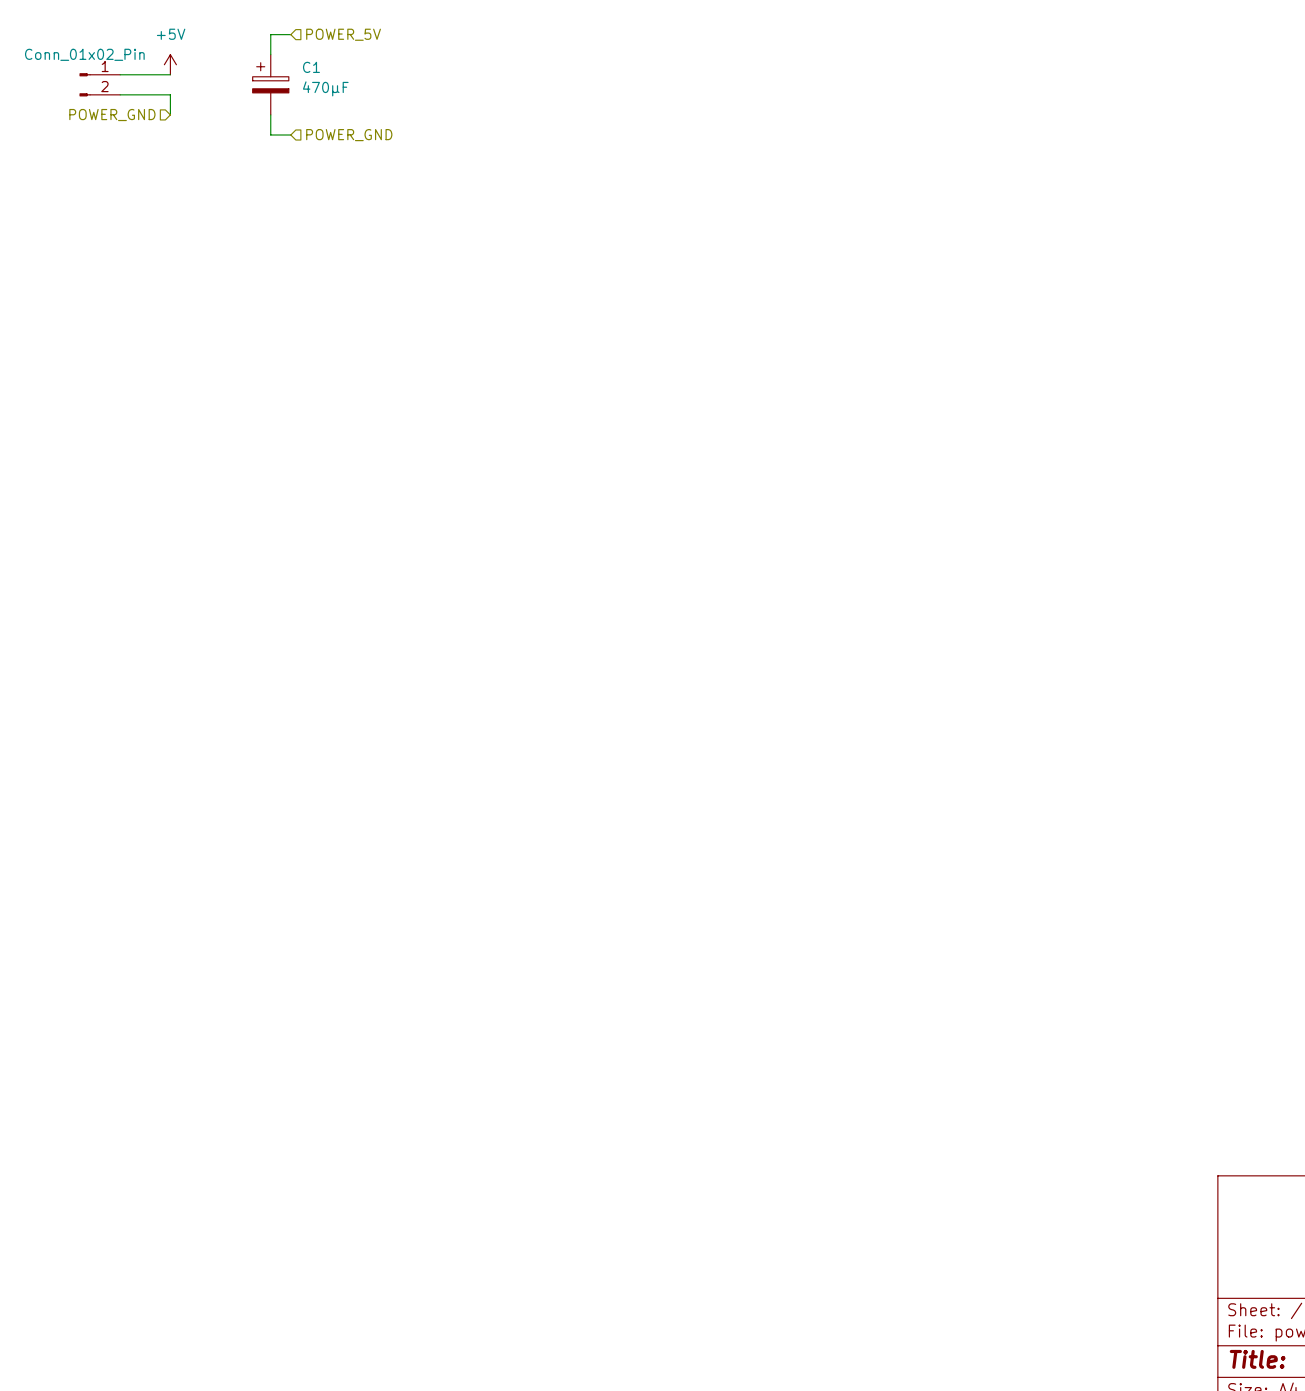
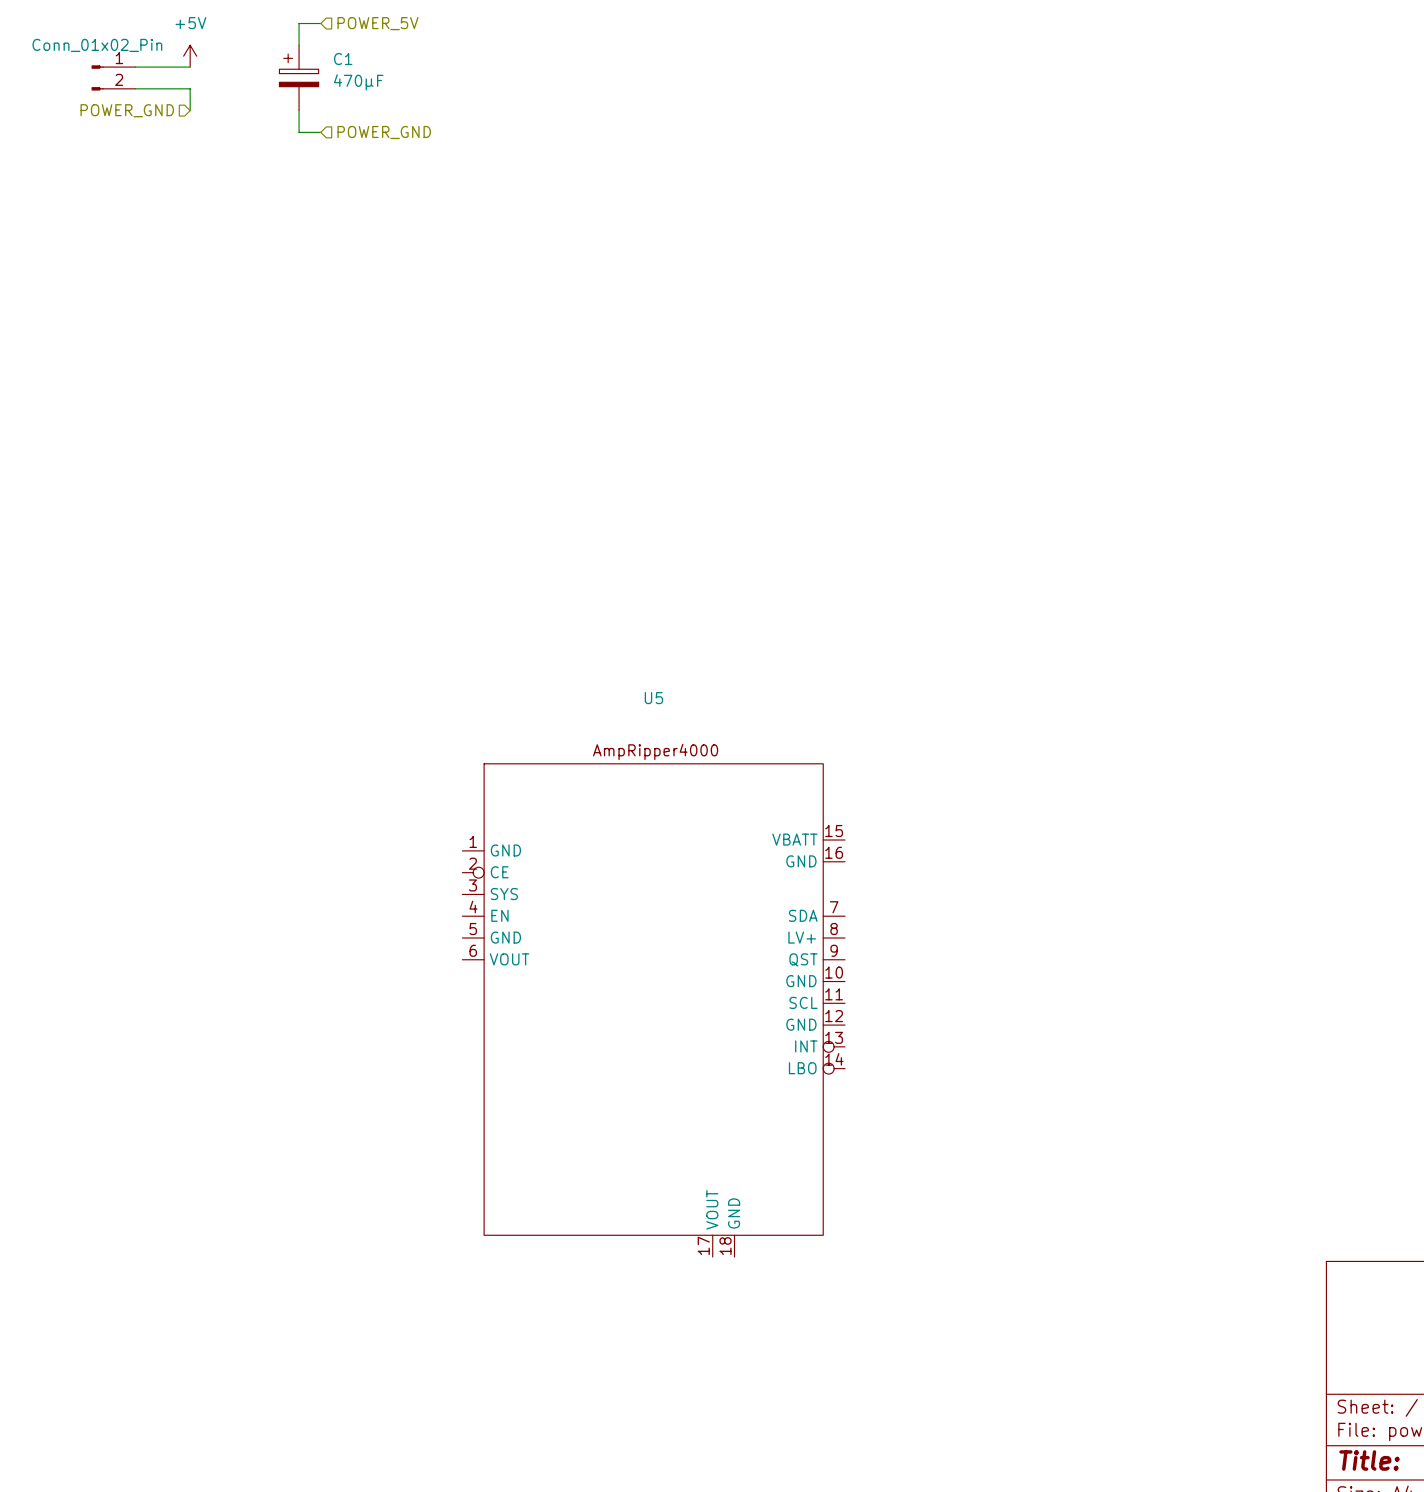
U5: none -> (653, 1010)

